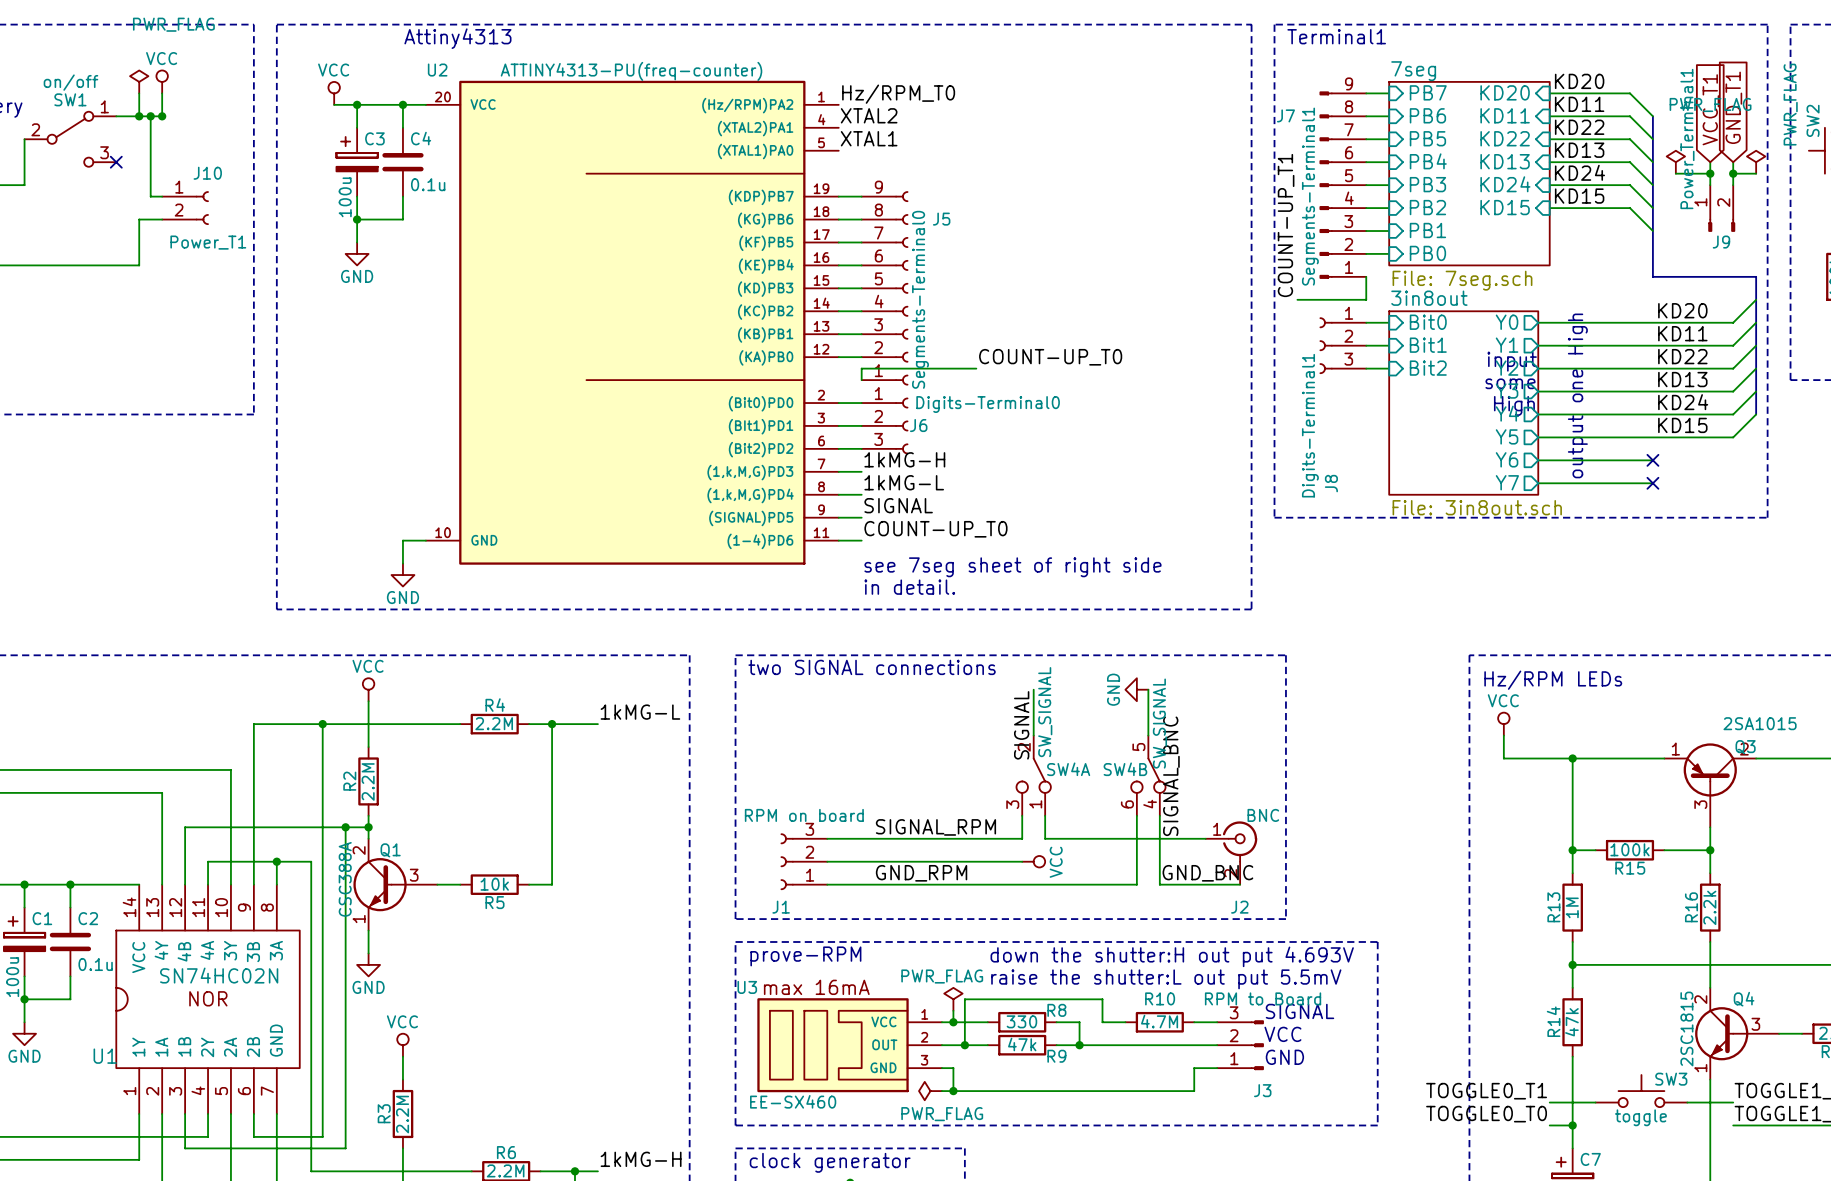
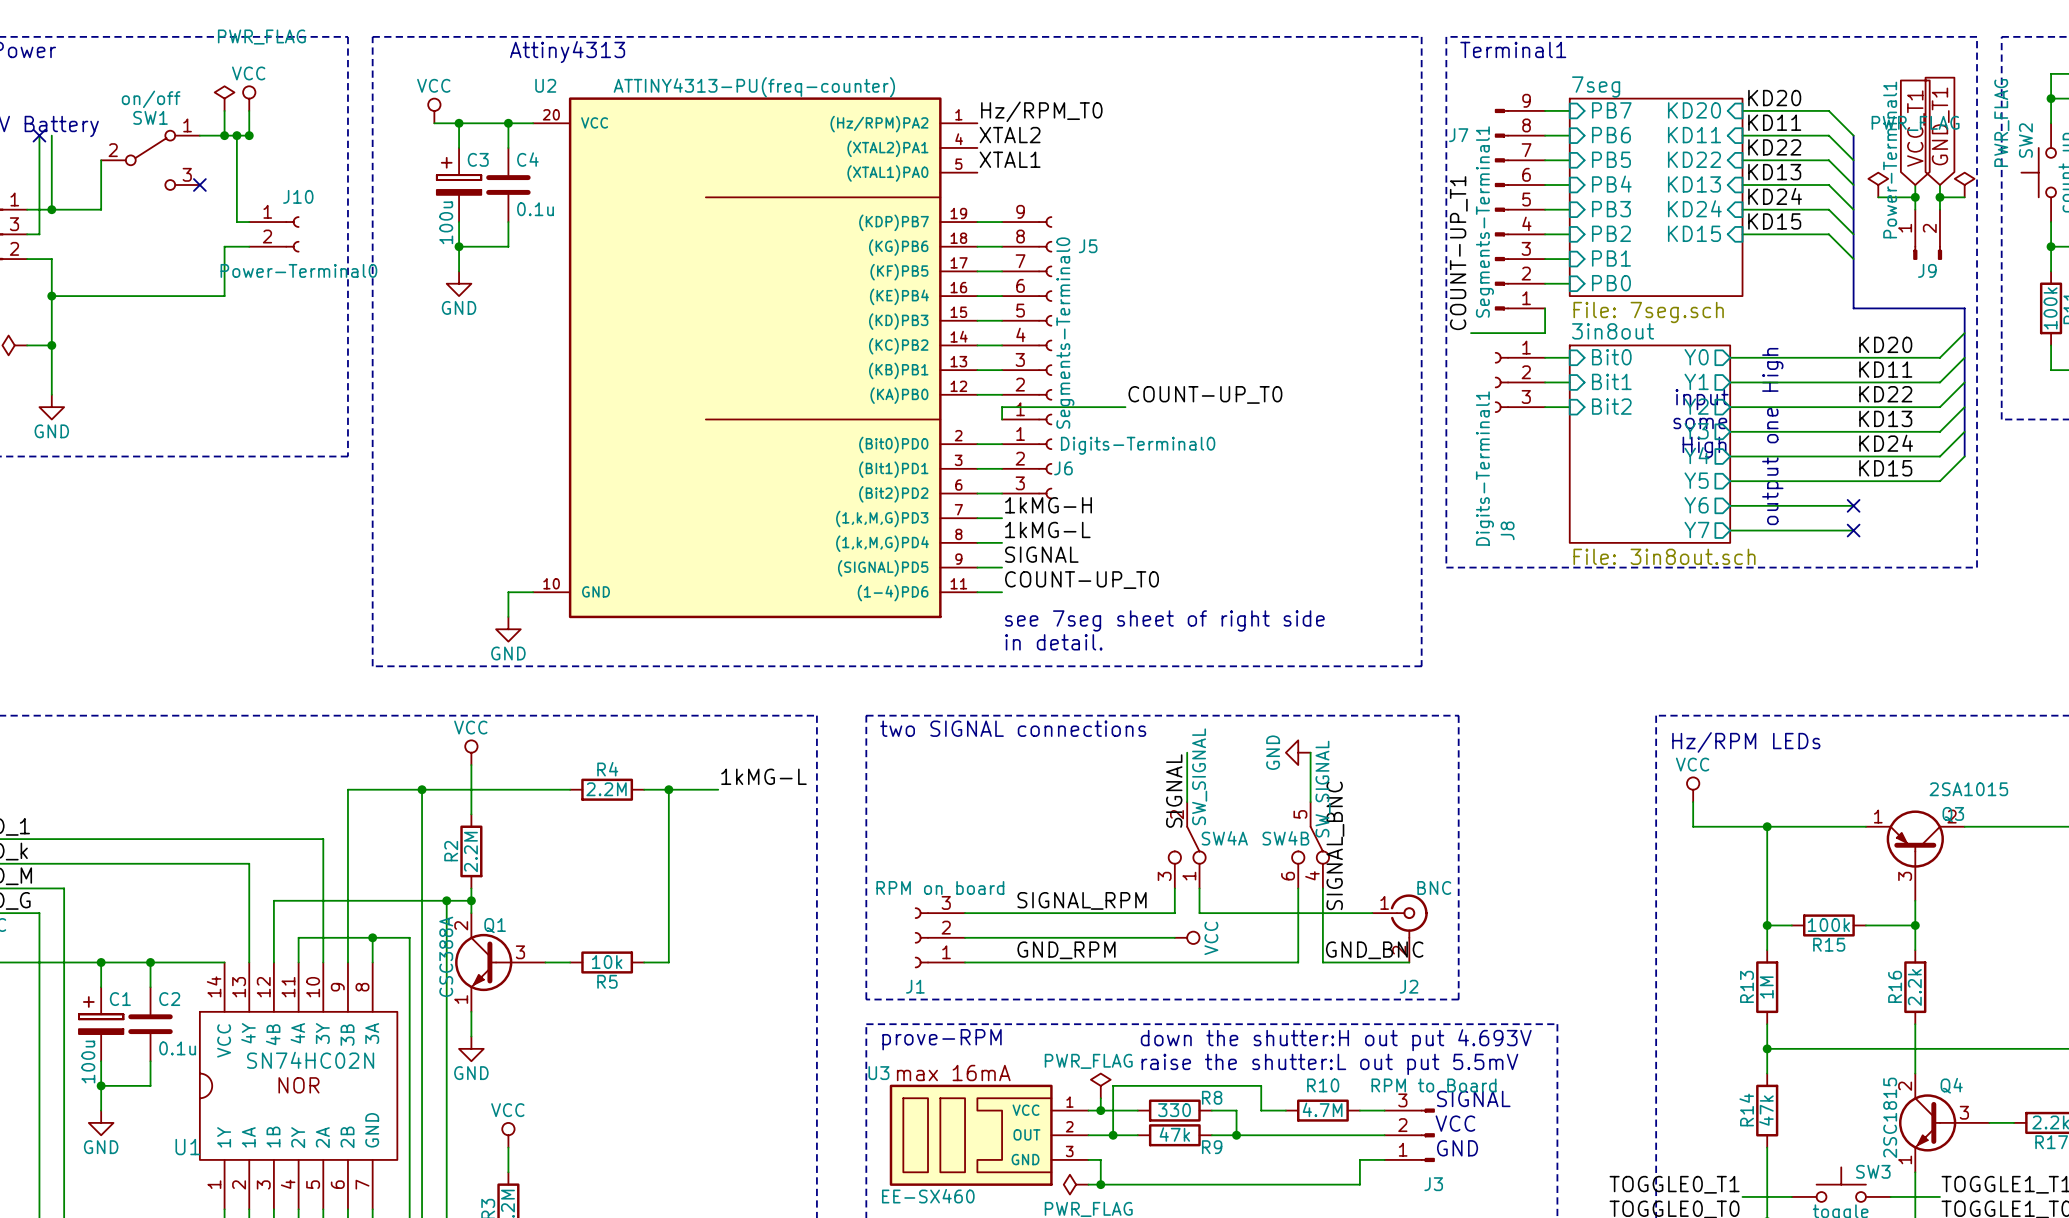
J9 value: Power_Terminal1 (1687, 138) -> Power-Terminal1 (1890, 160)
J10 value: Power_T1 (208, 242) -> Power-Terminal0 (298, 270)

